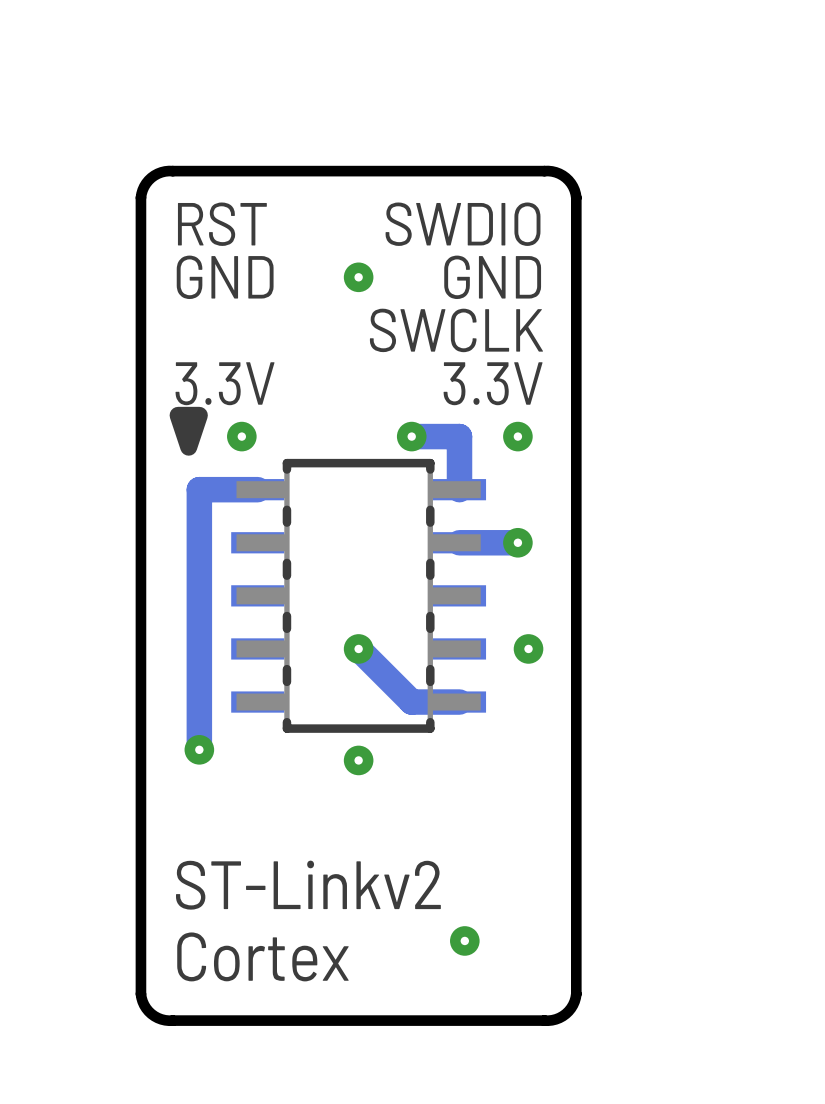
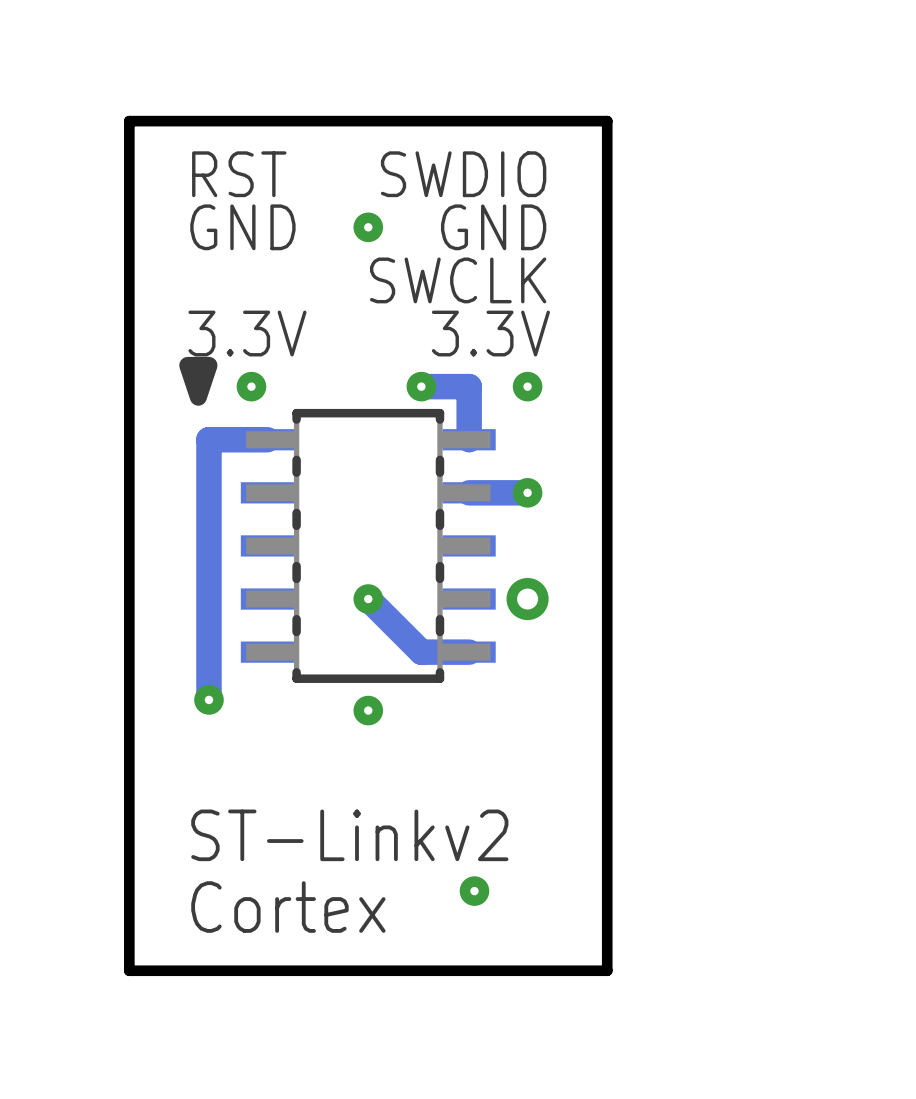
board edge: (172, 171) (161, 172) (151, 177) (144, 186) (140, 197) (140, 994) (144, 1005) (151, 1013) (161, 1019) (172, 1020) -> (182, 121) (129, 121) (129, 970) (182, 970)
board edge: (544, 171) (555, 172) (565, 177) (573, 186) (576, 197) (576, 994) (573, 1005) (565, 1013) (555, 1019) (544, 1020) -> (554, 121) (607, 121) (607, 970) (554, 970)
via size: [513, 634, 544, 664] -> [506, 577, 549, 621]

